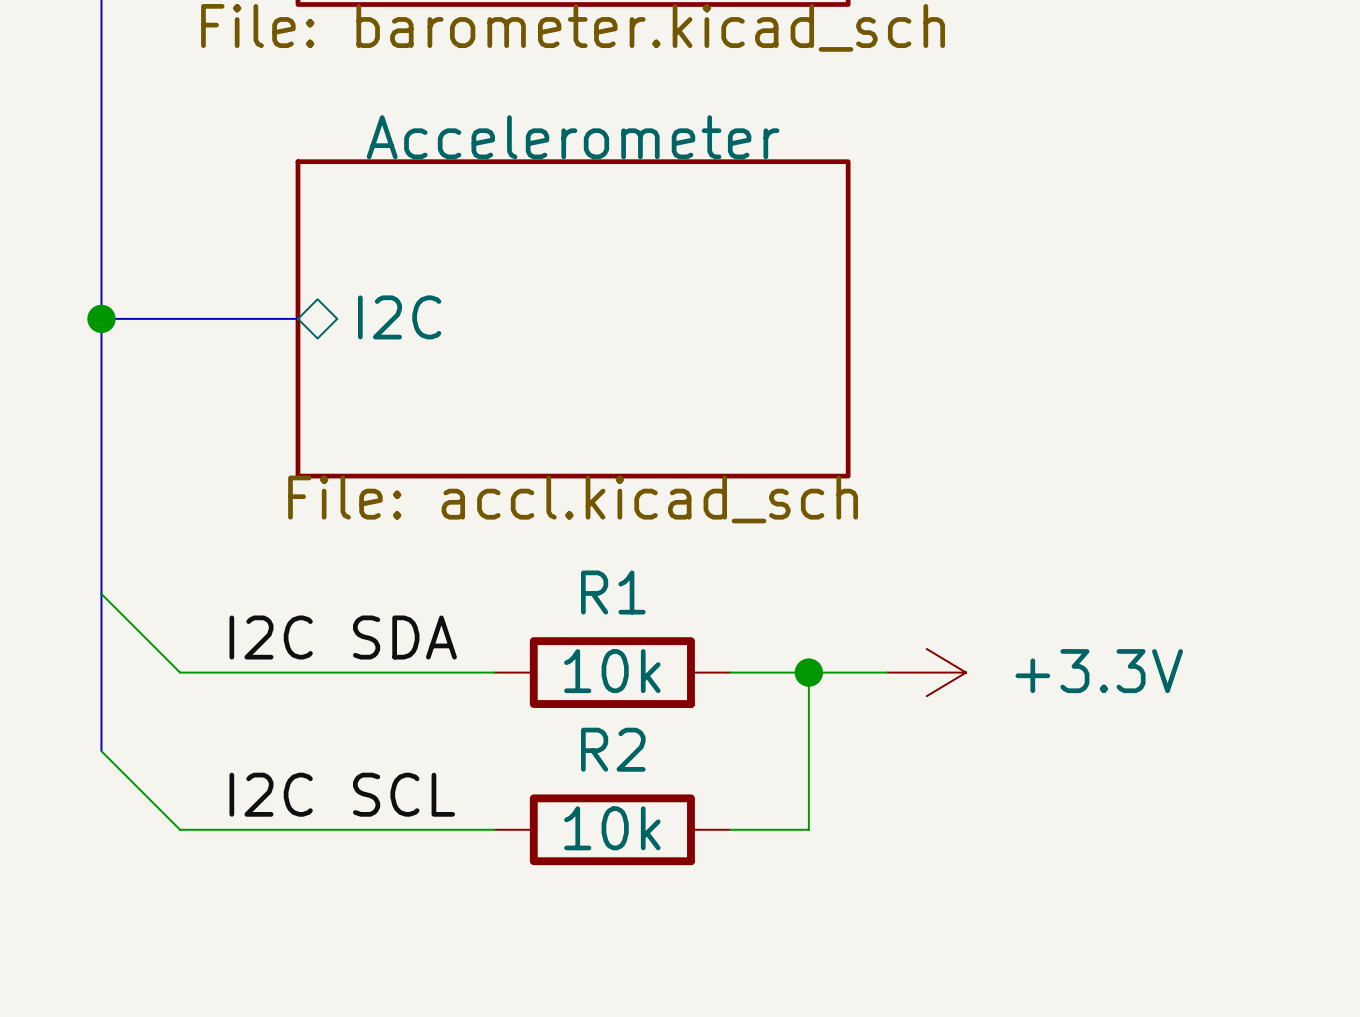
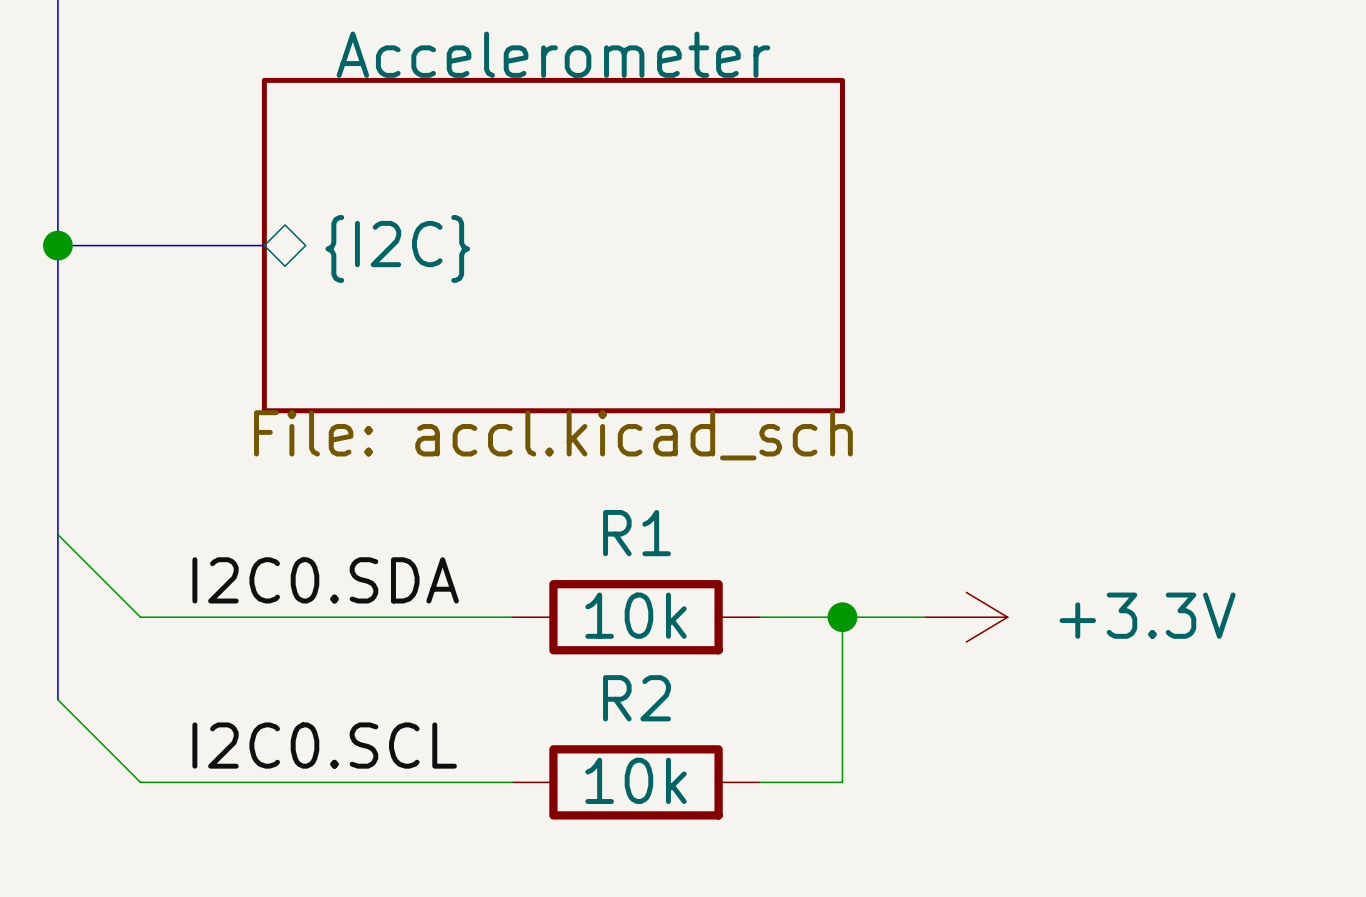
sheet pin: I2C (399, 317) -> {I2C} (397, 248)
label: I2C SDA (343, 637) -> I2C0.SDA (325, 580)
R1 position: (612, 672) -> (636, 617)
wire: (808, 672) (808, 829) -> (842, 617) (842, 782) (801, 782)
junction position: (808, 672) -> (842, 617)
power symbol position: +3.3V (926, 672) -> +3.3V (966, 617)
label: I2C SCL (342, 794) -> I2C0.SCL (324, 745)
R2 position: (612, 829) -> (636, 782)

